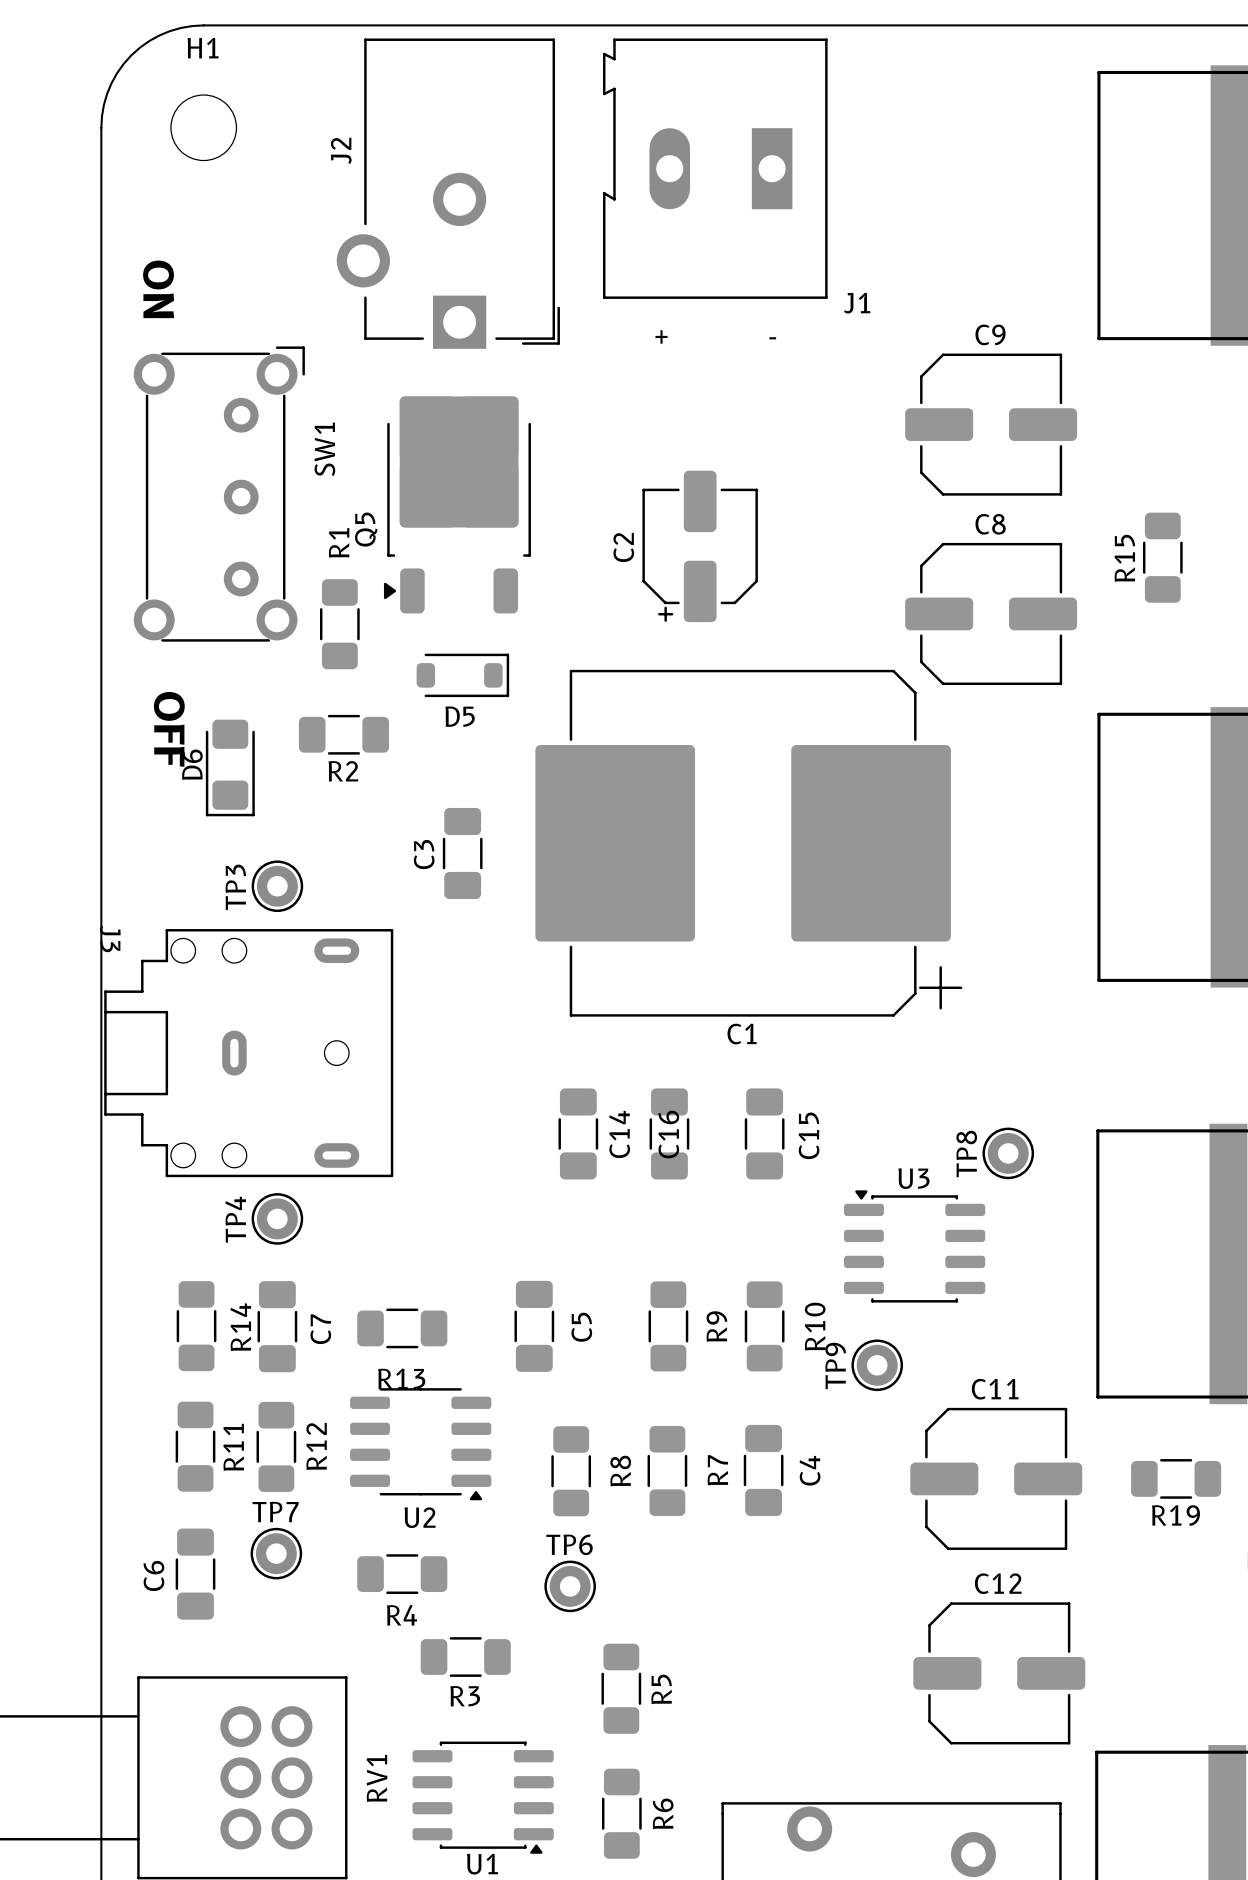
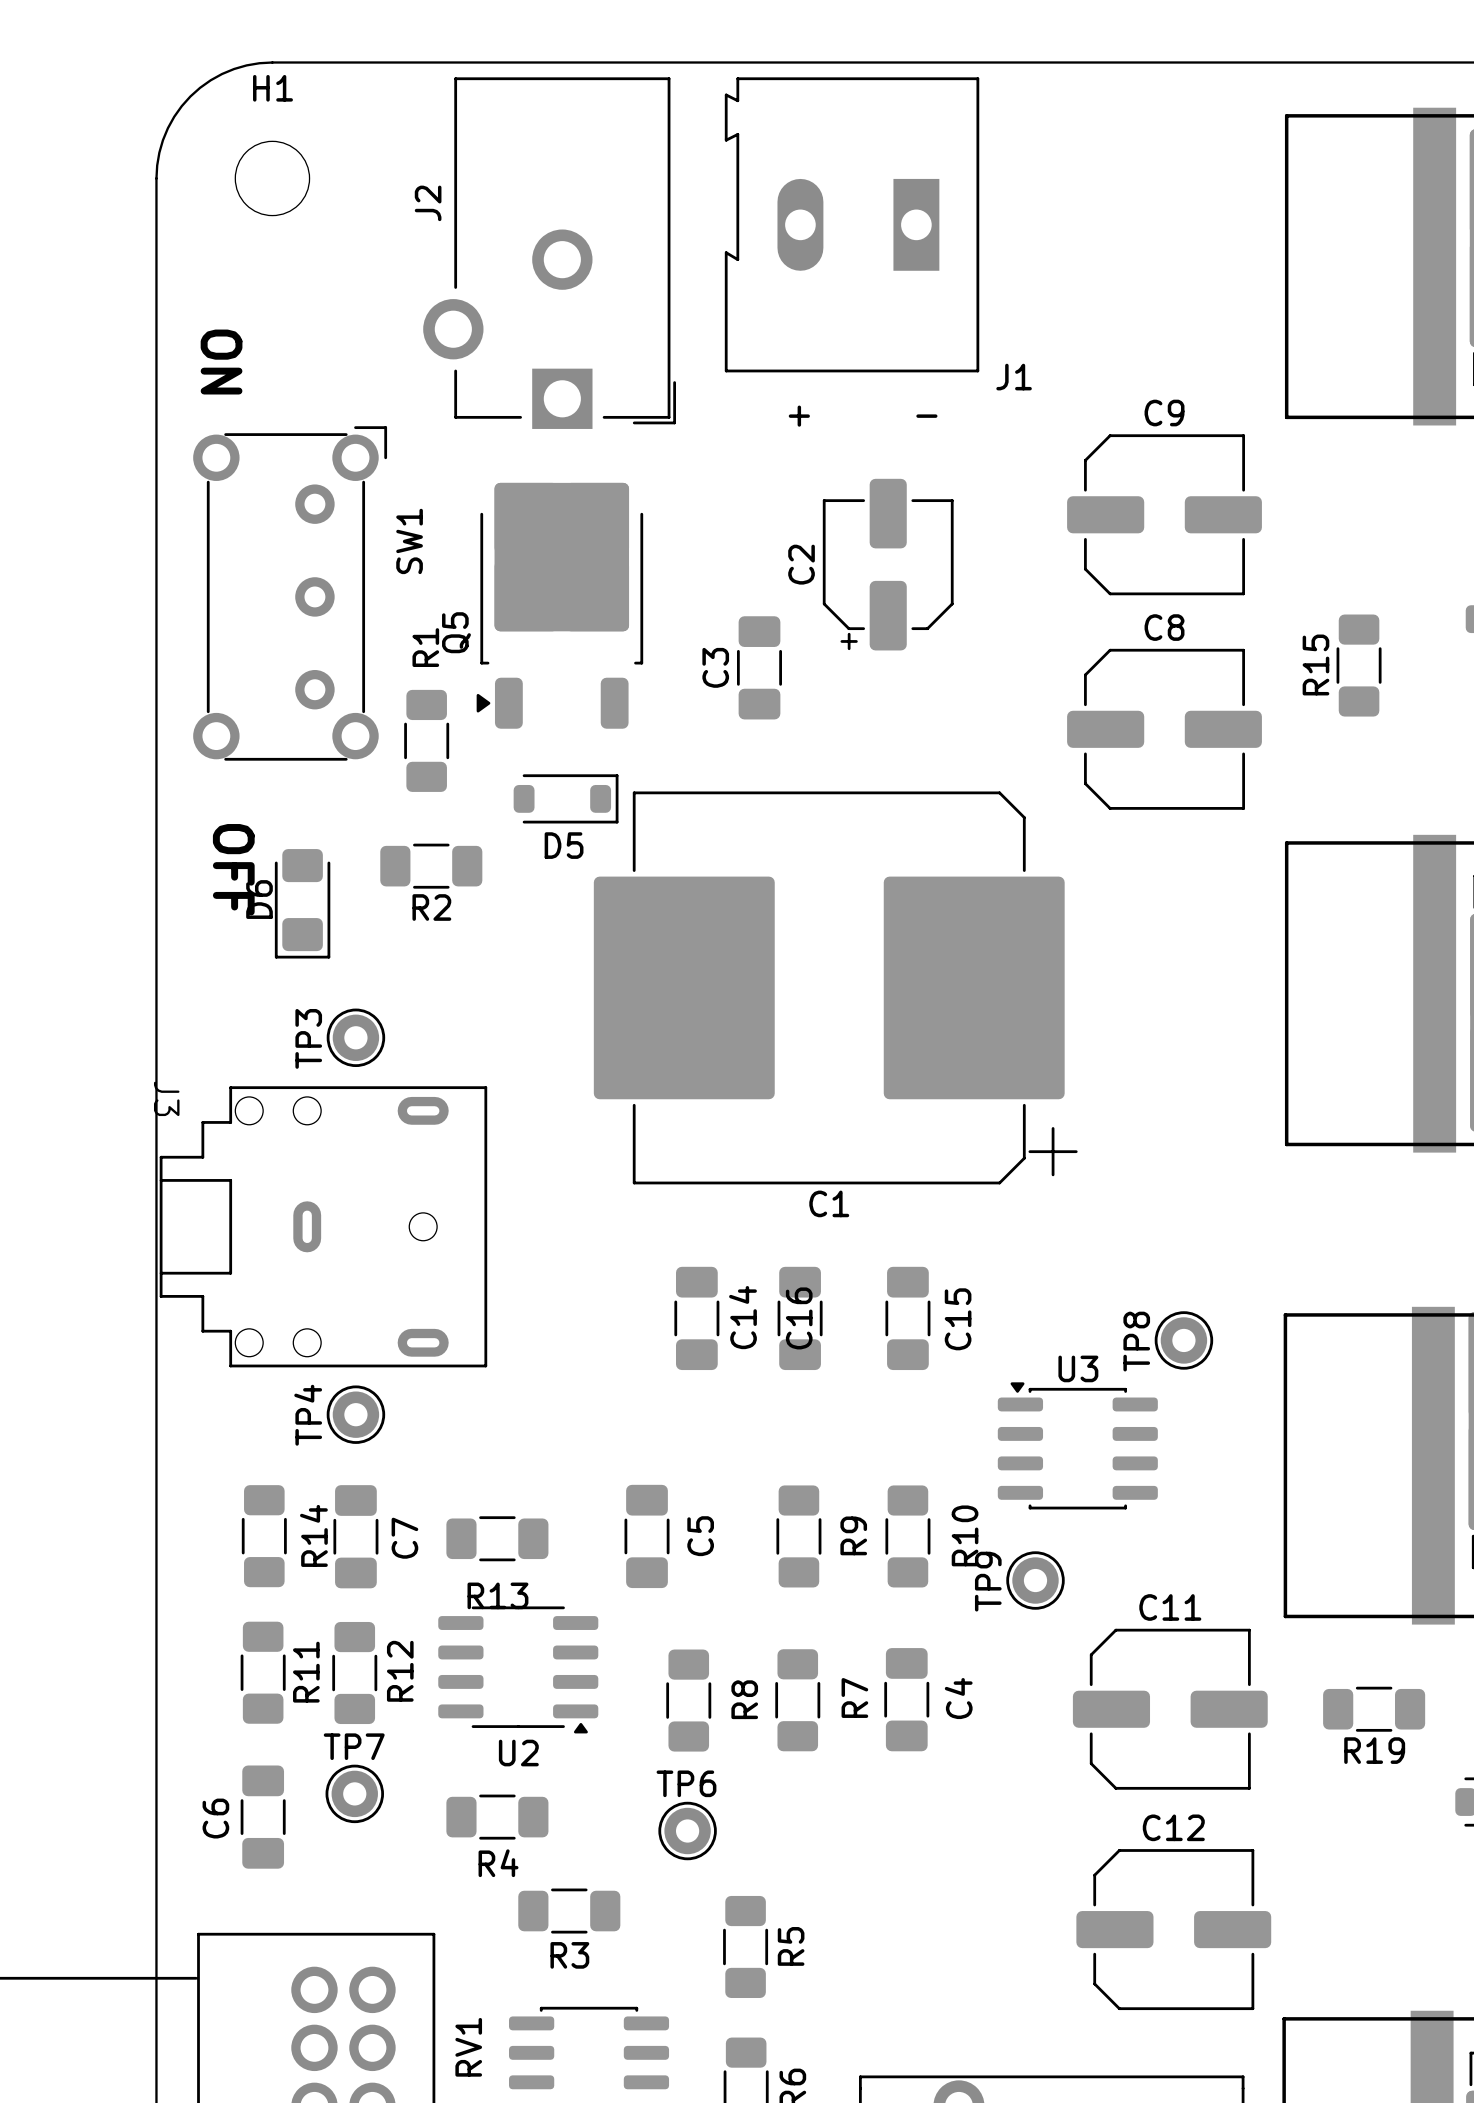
C2 position: (700, 546) -> (888, 564)
C1 position: (748, 843) -> (835, 987)
C3 position: (462, 853) -> (759, 667)

